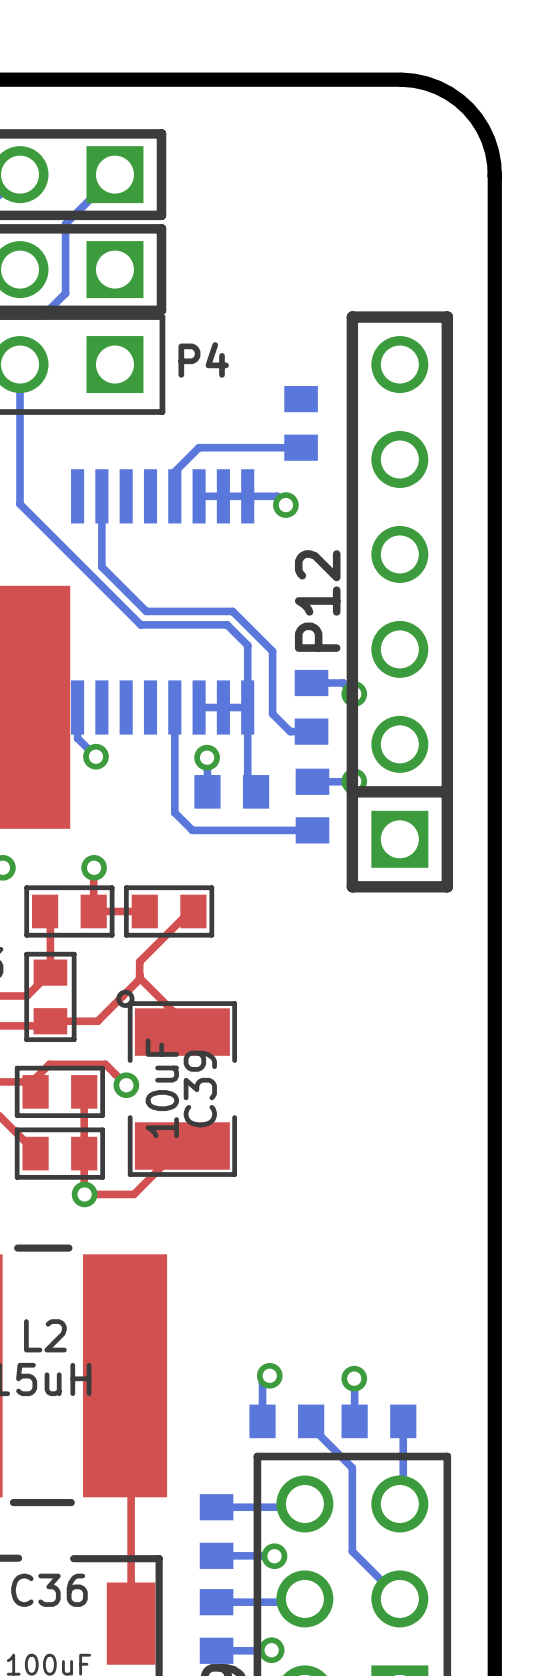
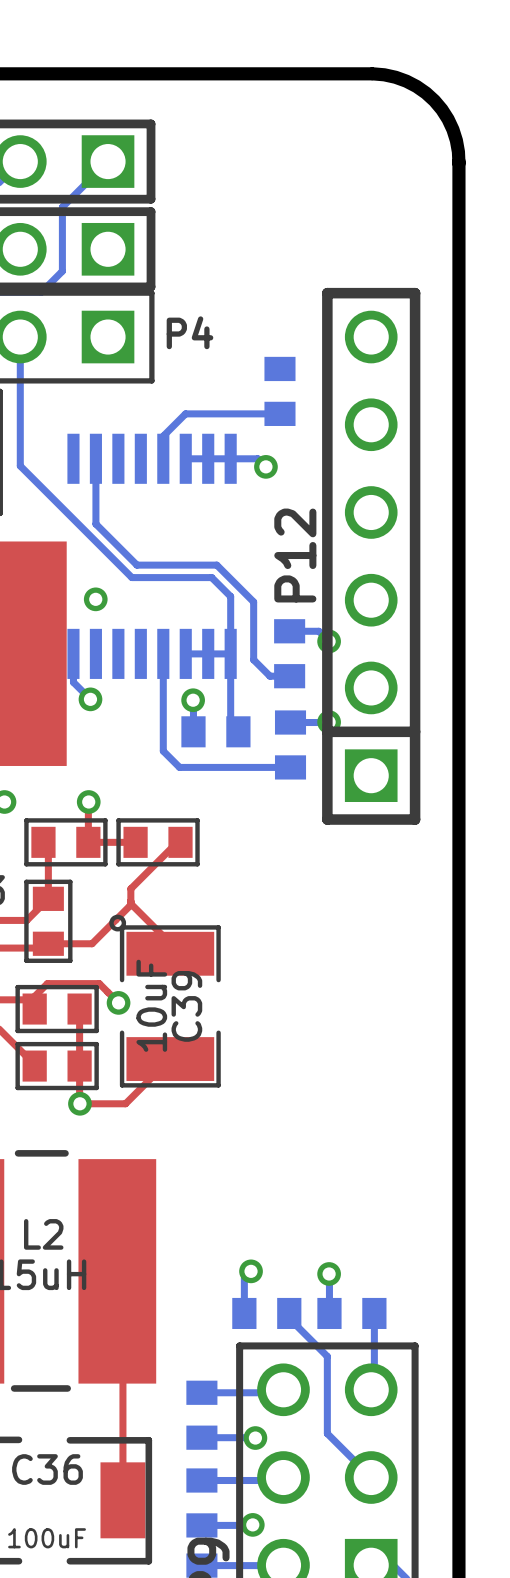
via: none -> (95, 599)

